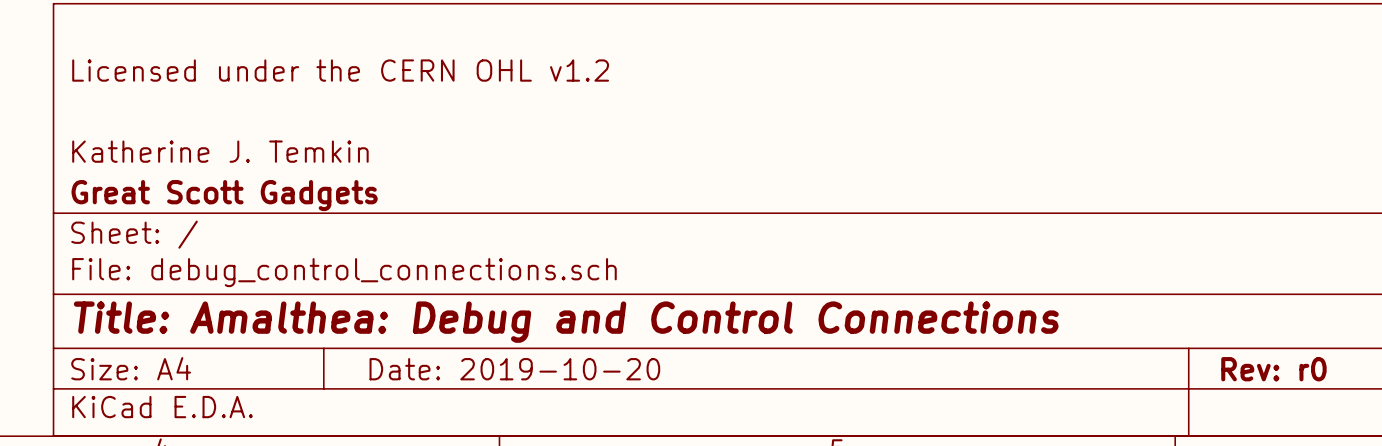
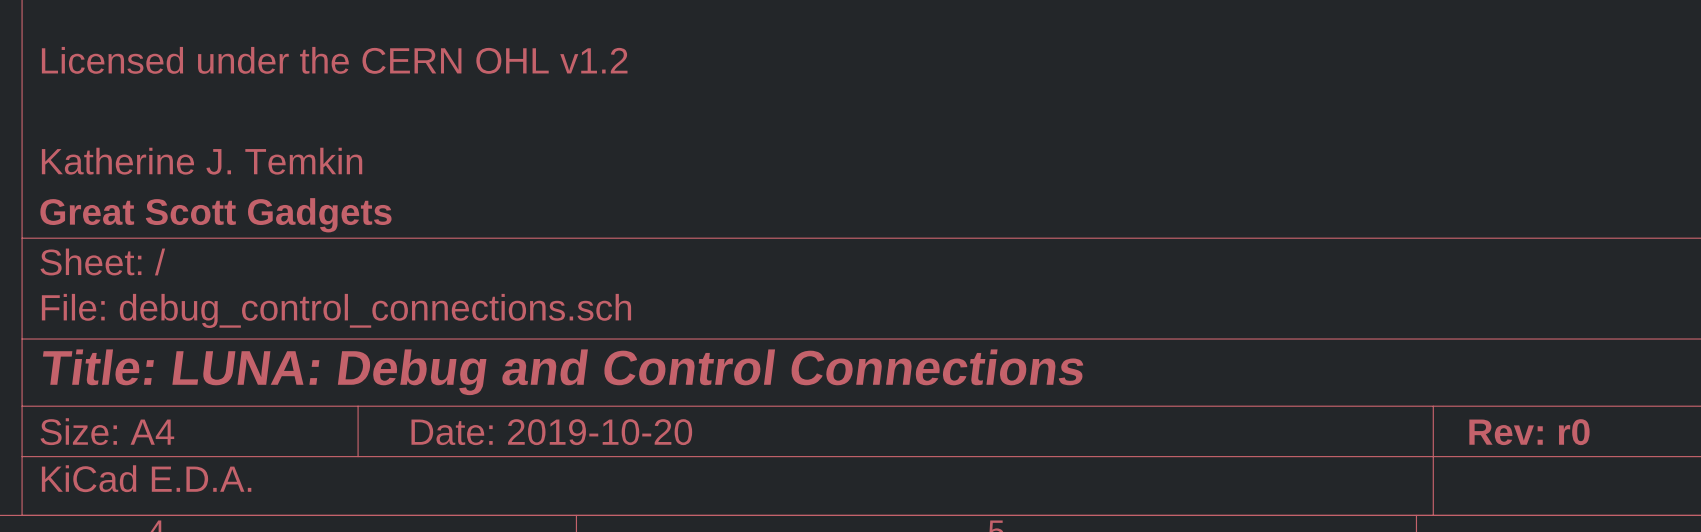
title block: Title: Amalthea: Debug and Control Connections (566, 322) -> Title: LUNA: Debug and Control Connections (563, 372)

